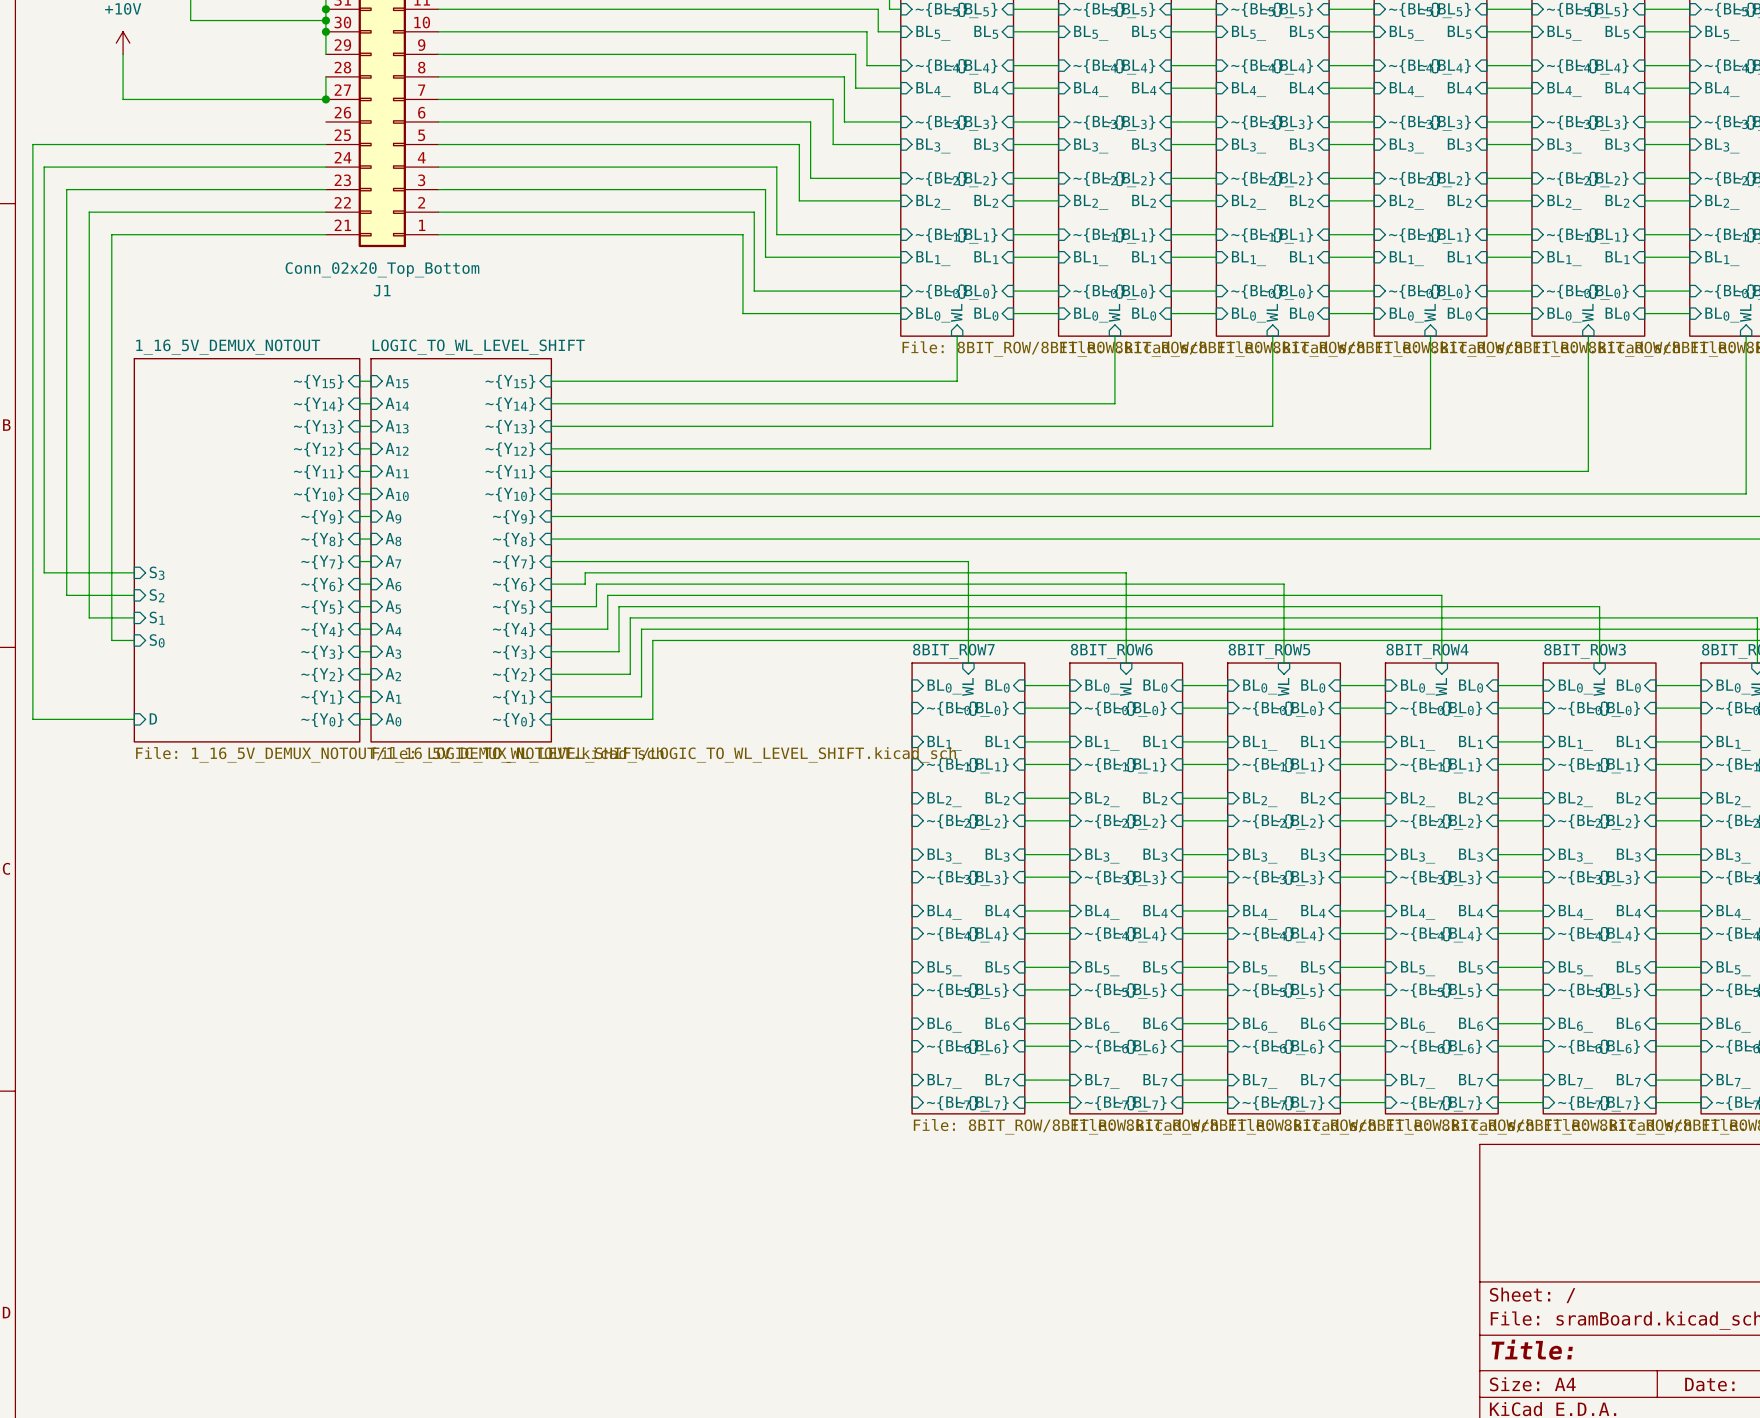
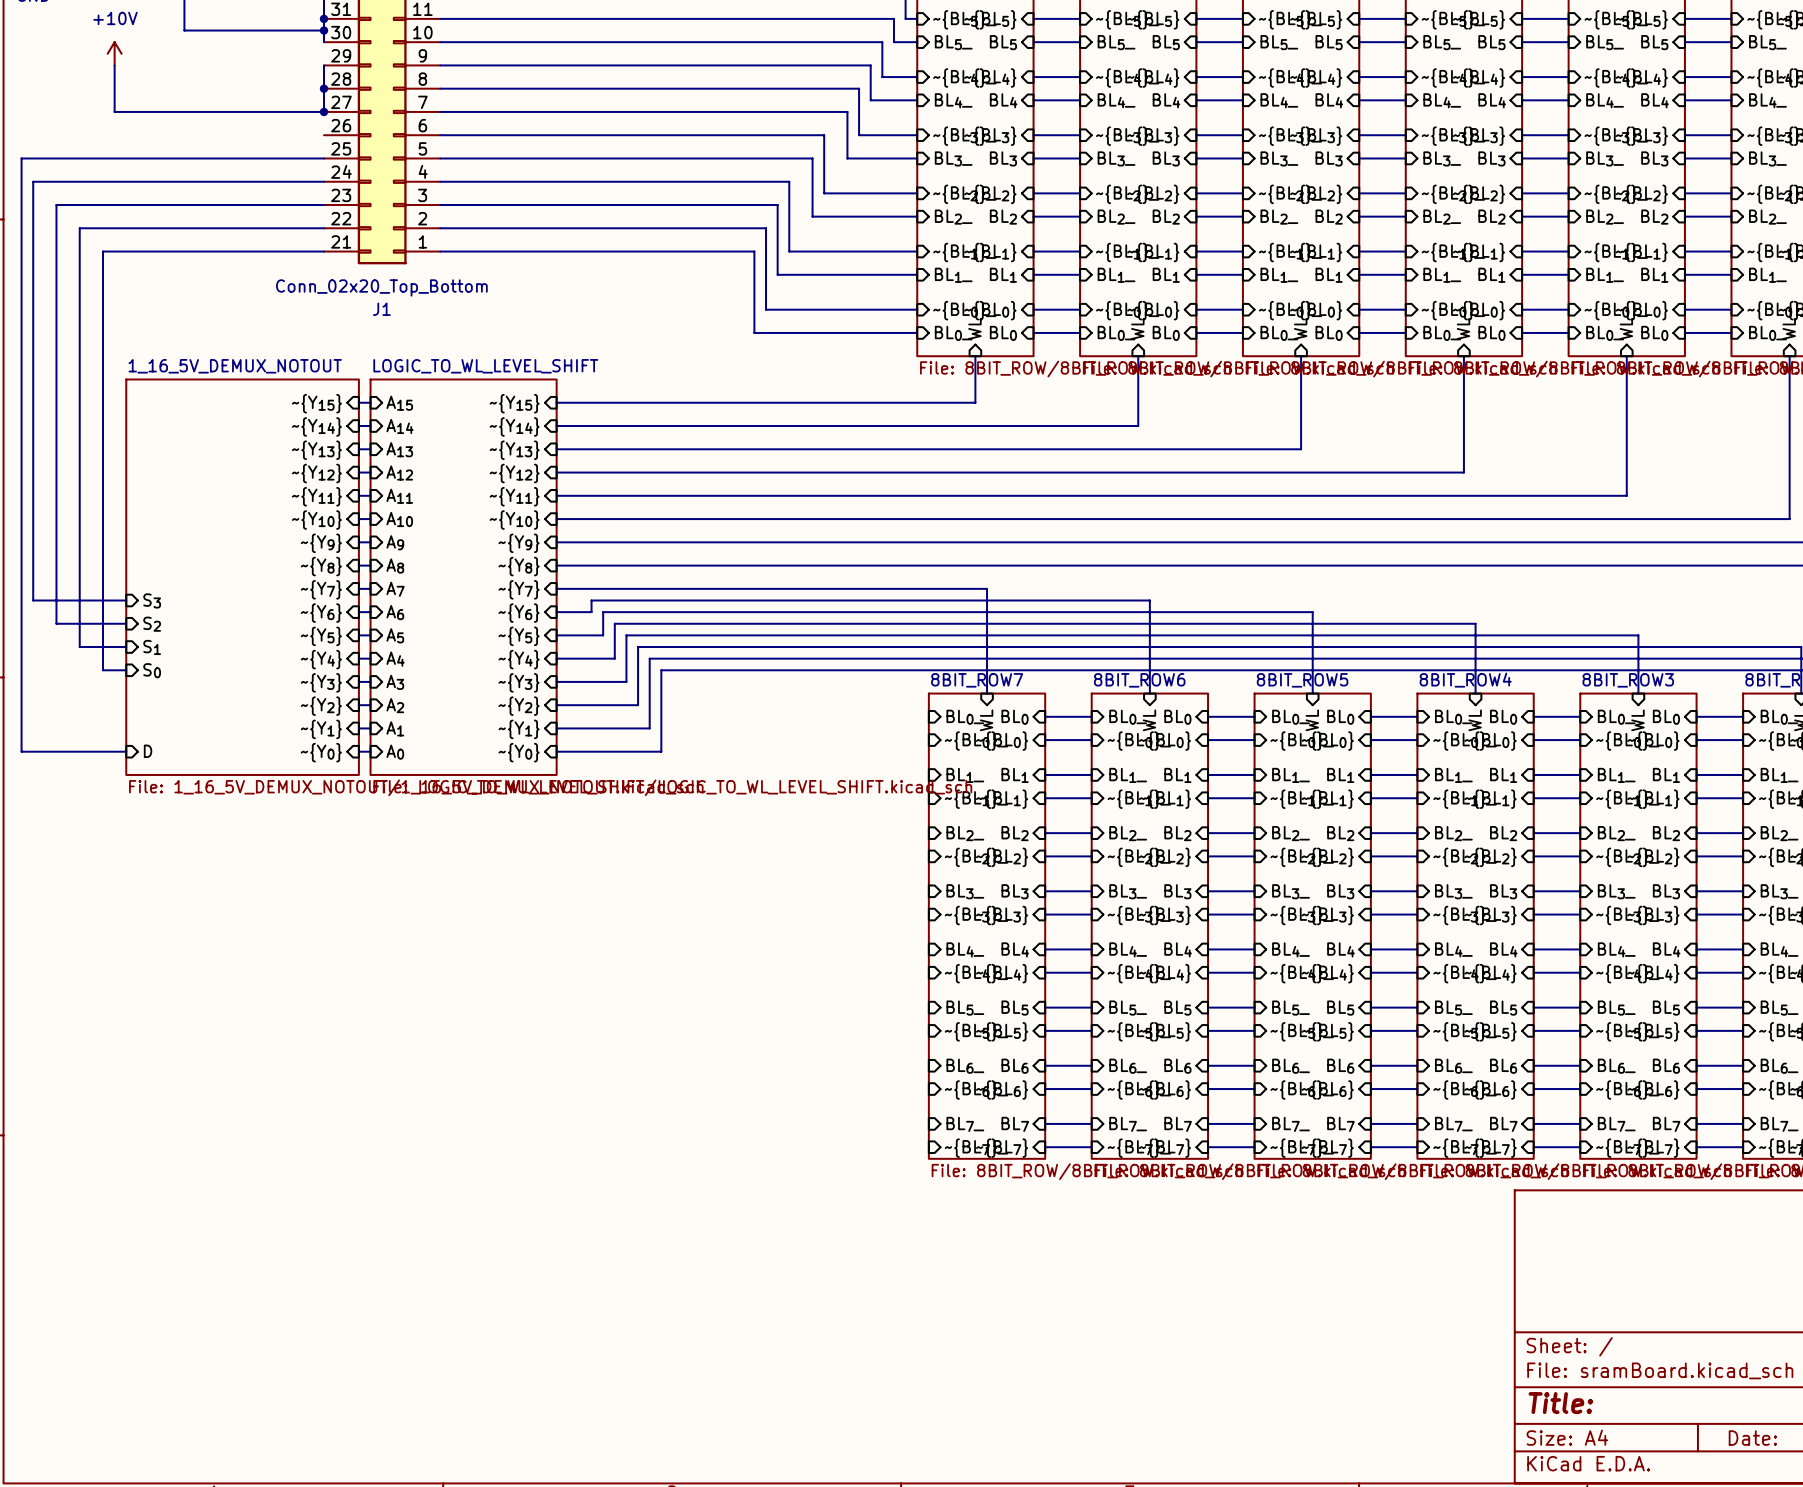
wire: (325, 31) (325, 54) -> (324, 88) (324, 65)
junction position: (325, 31) -> (324, 88)

